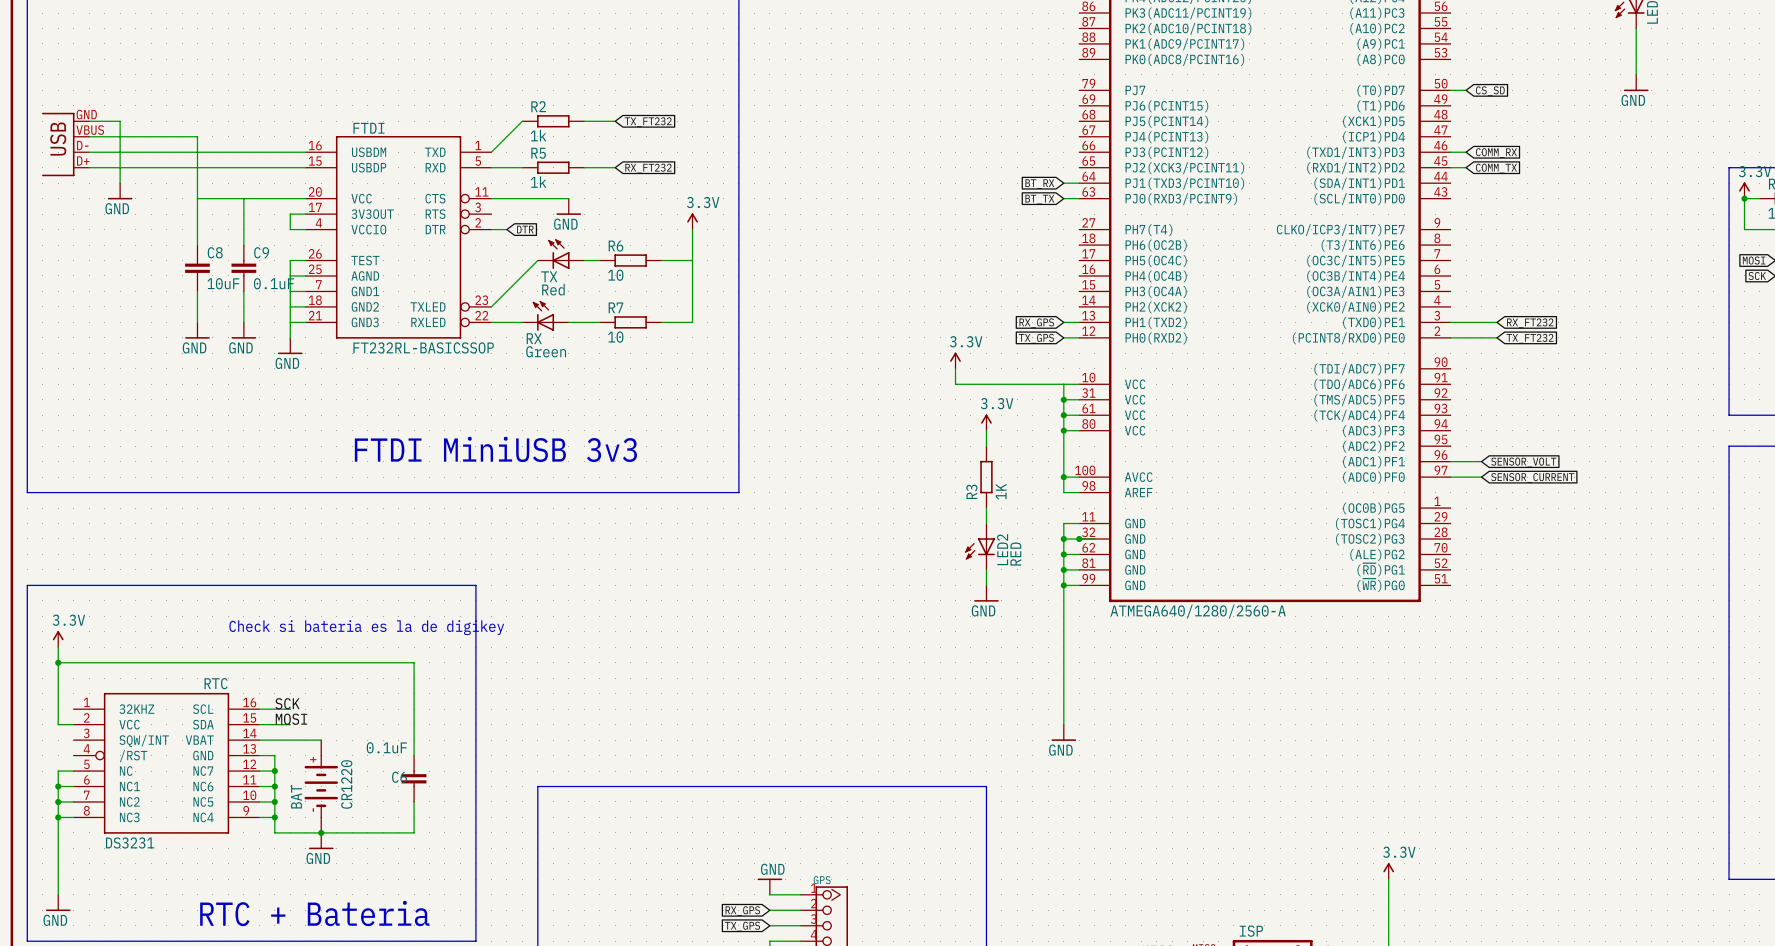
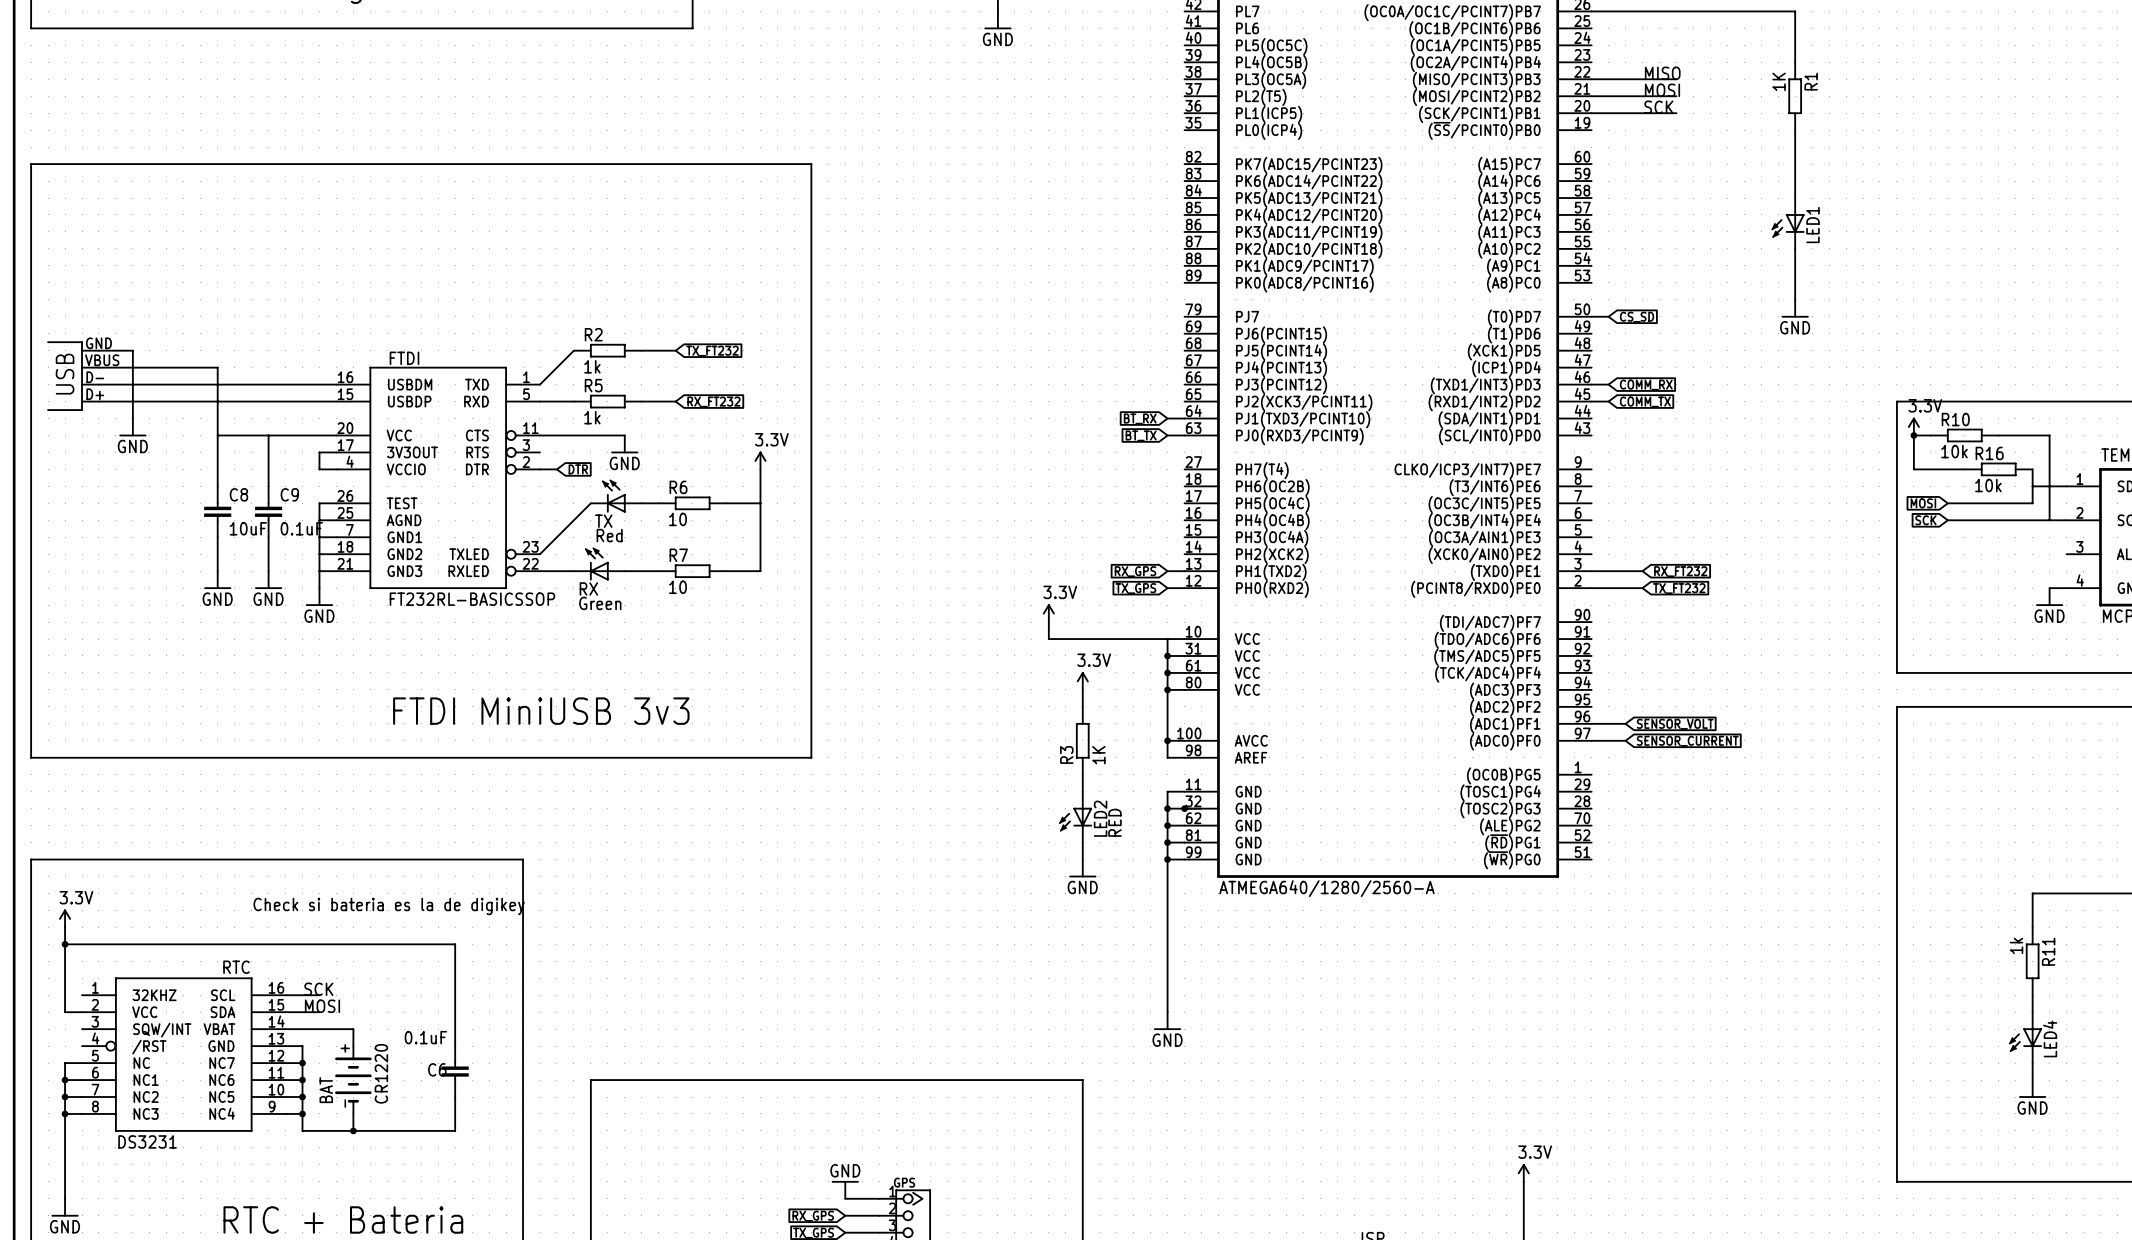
power symbol: GND (321, 841) -> none

